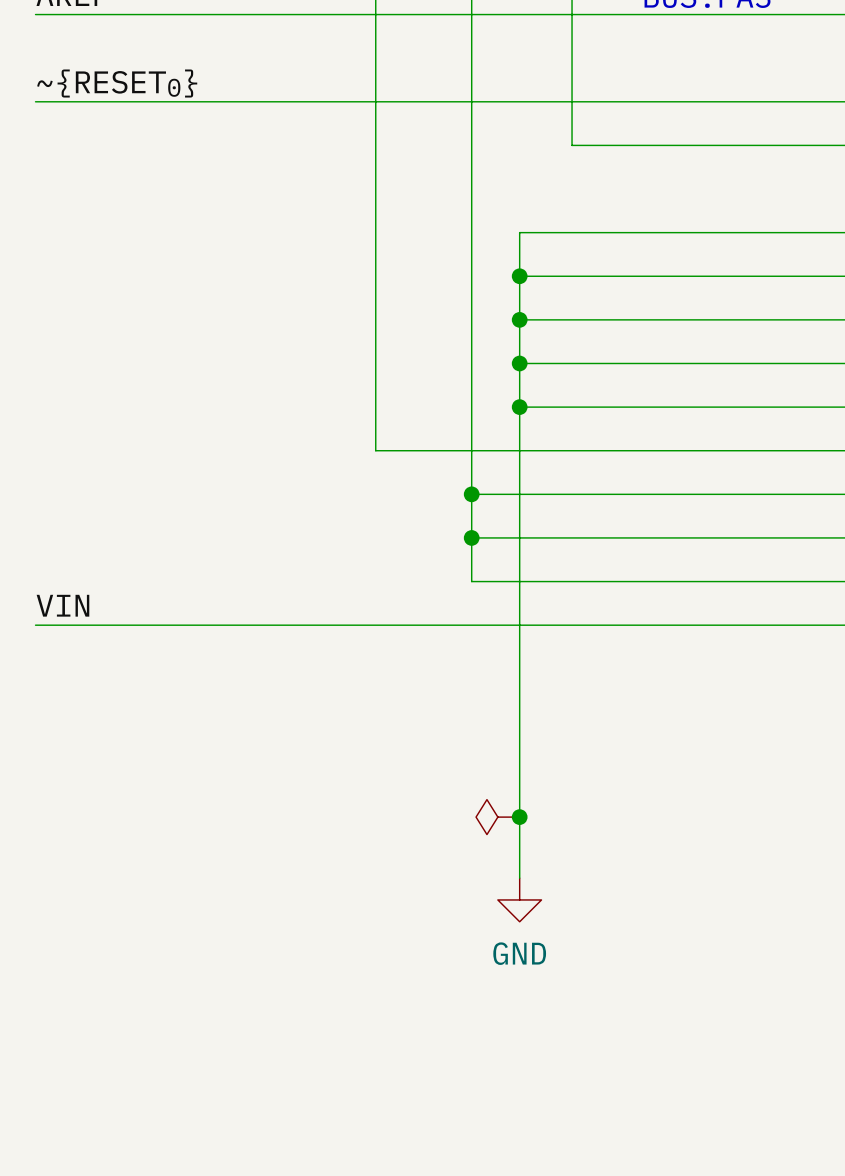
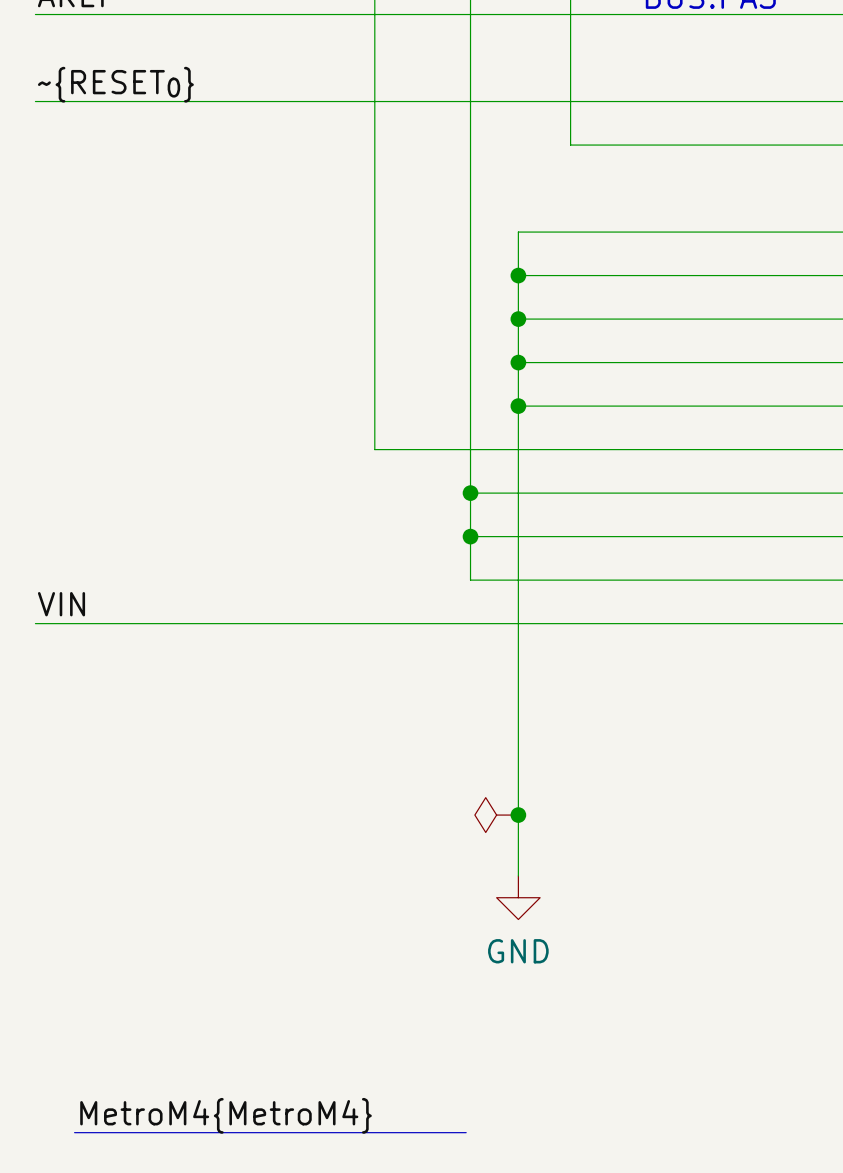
label: none -> MetroM4{MetroM4} (226, 1115)
bus: none -> (74, 1132) (466, 1132)

